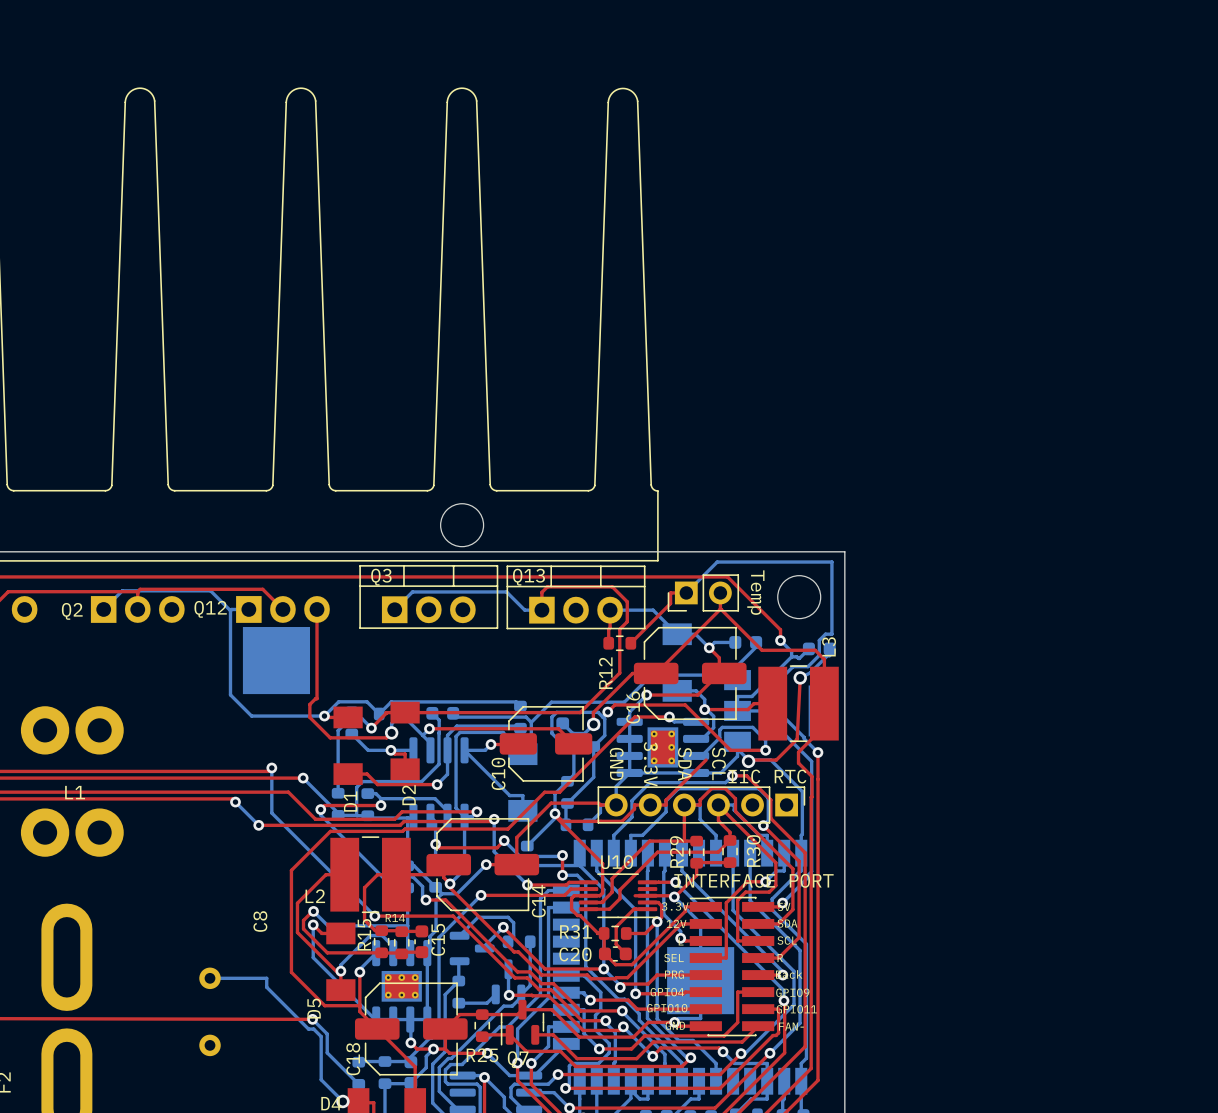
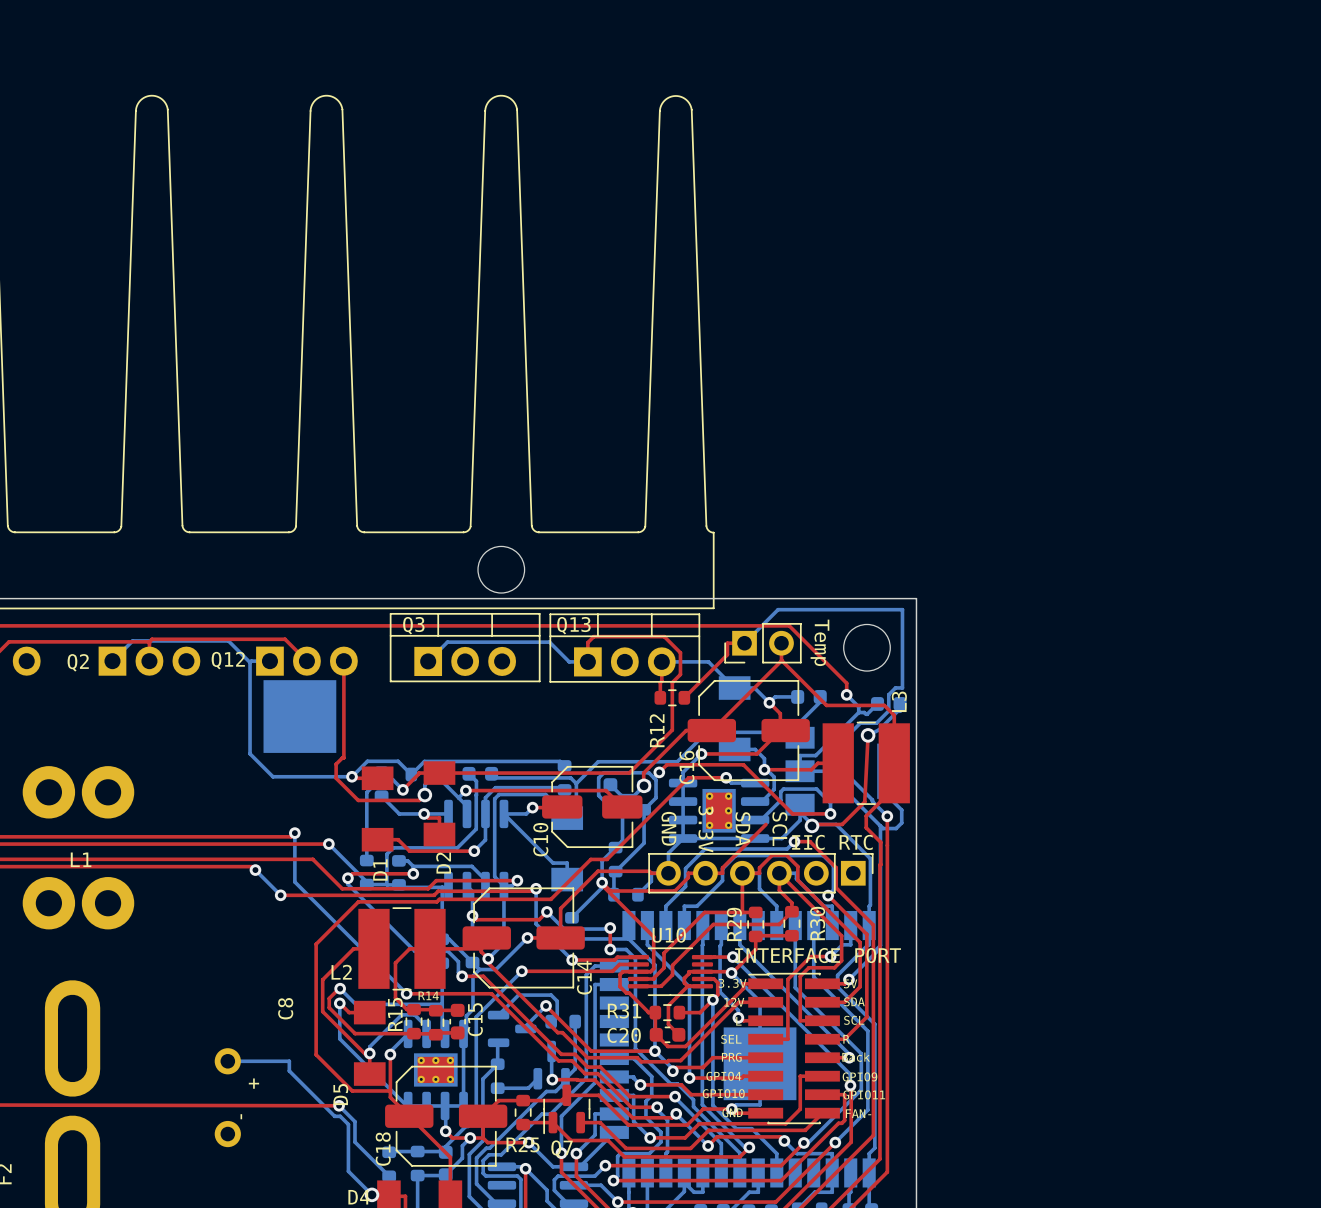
bottom track: none -> (891, 771) (891, 800) (901, 810) (901, 822) (896, 828) (883, 828) (880, 826)
top track: none -> (689, 971) (684, 978) (684, 982) (687, 986)
C8 footprint: [199, 967, 221, 1057] -> [214, 1048, 241, 1148]

